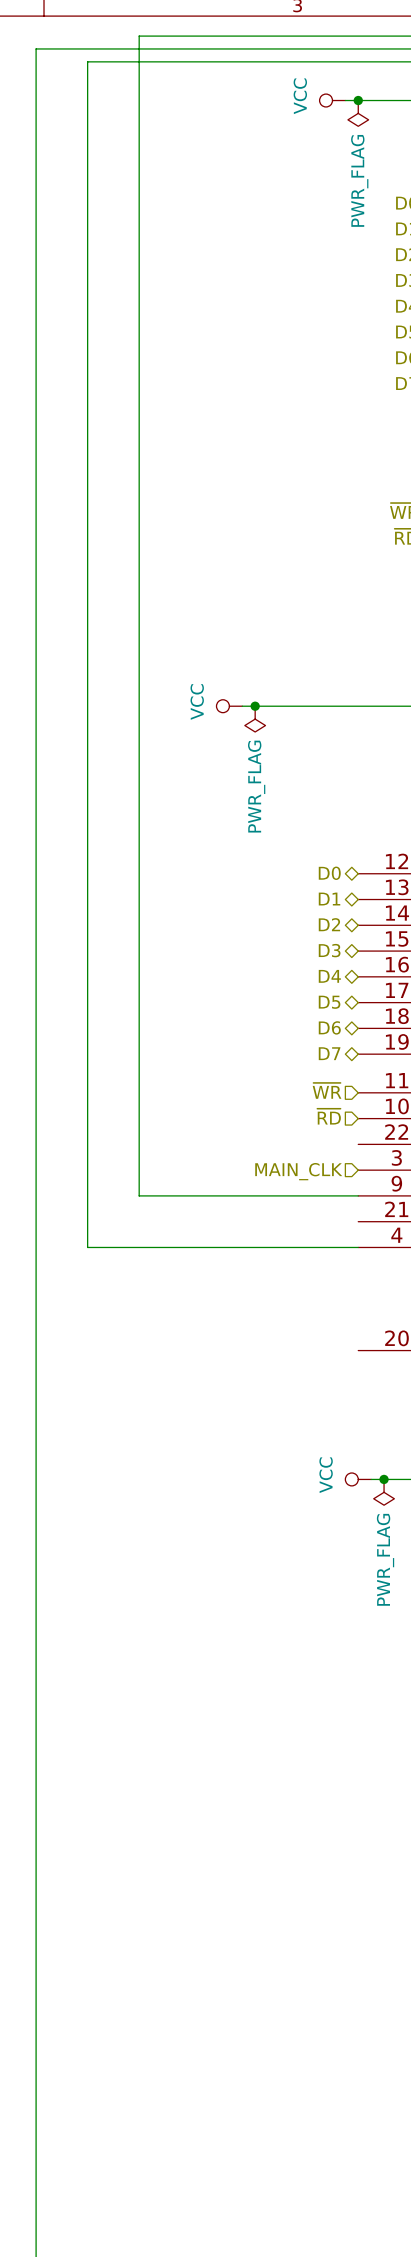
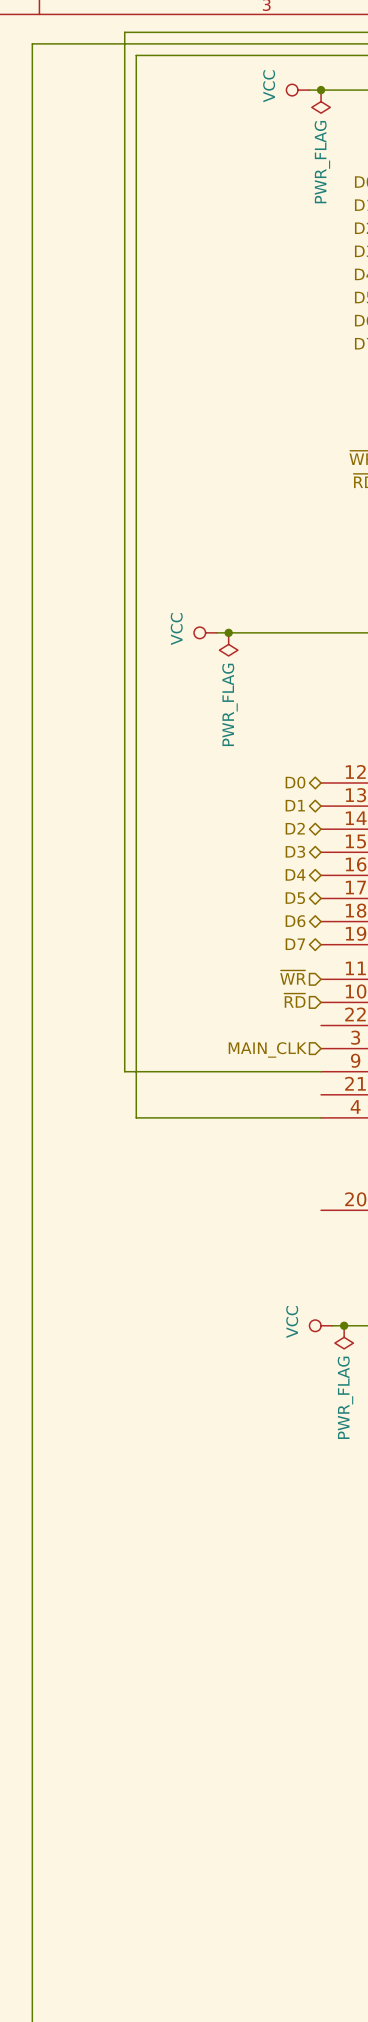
wire: (152, 61) (87, 61) (87, 1247) (152, 1247) -> (136, 55) (136, 1117)

